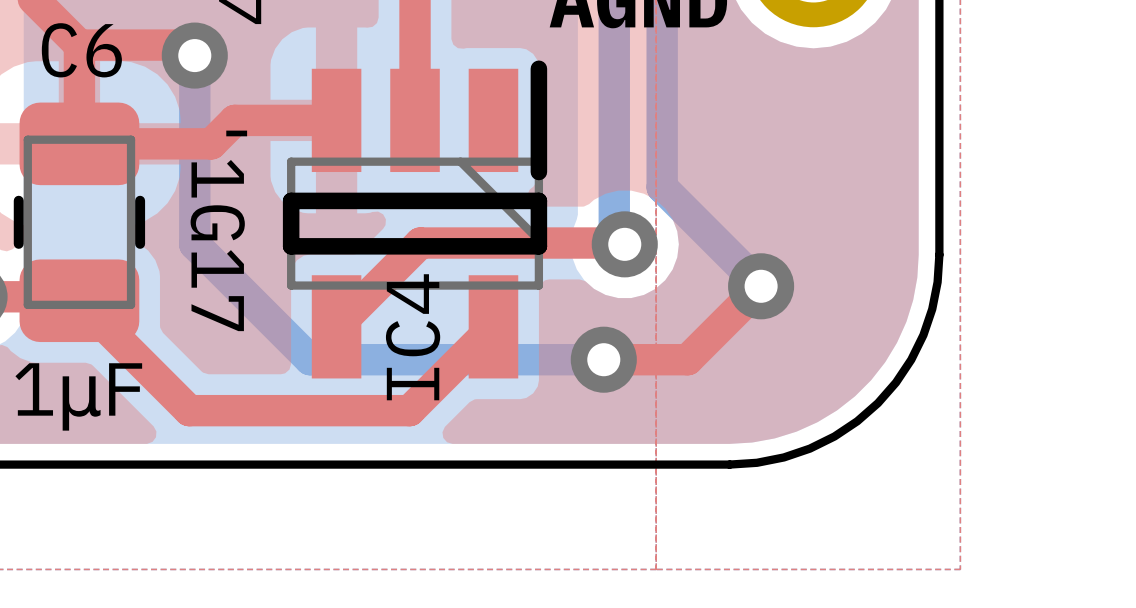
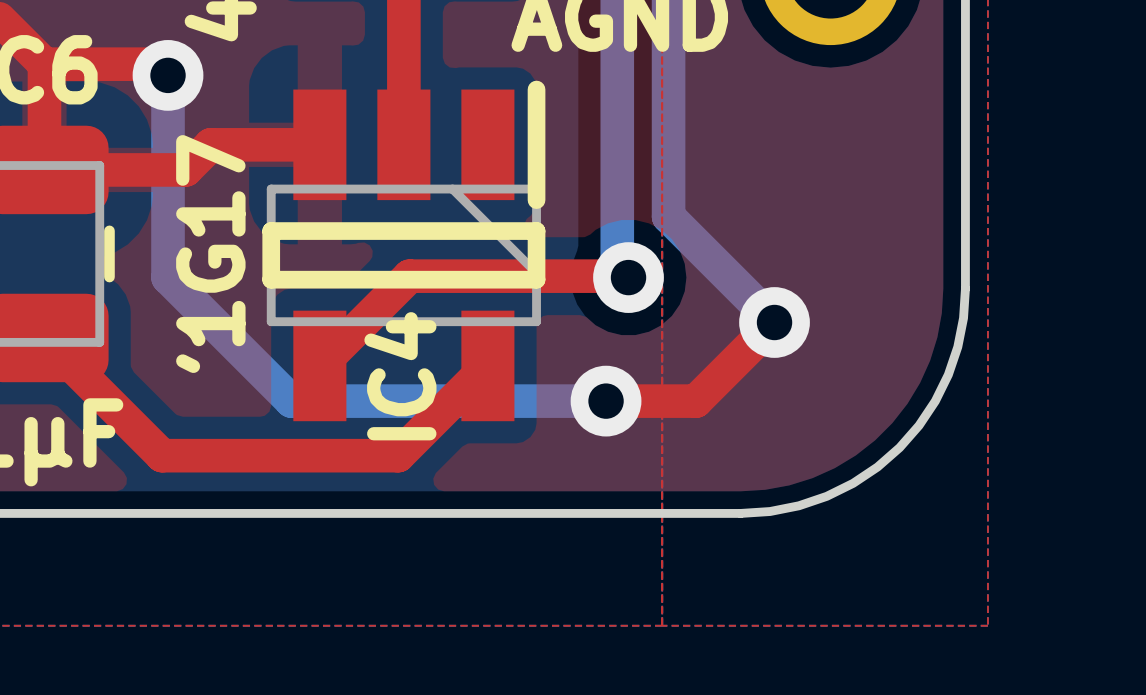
IC4 text: none -> '1G17 (210, 254)
IC4 text: '1G17 (218, 230) -> none

